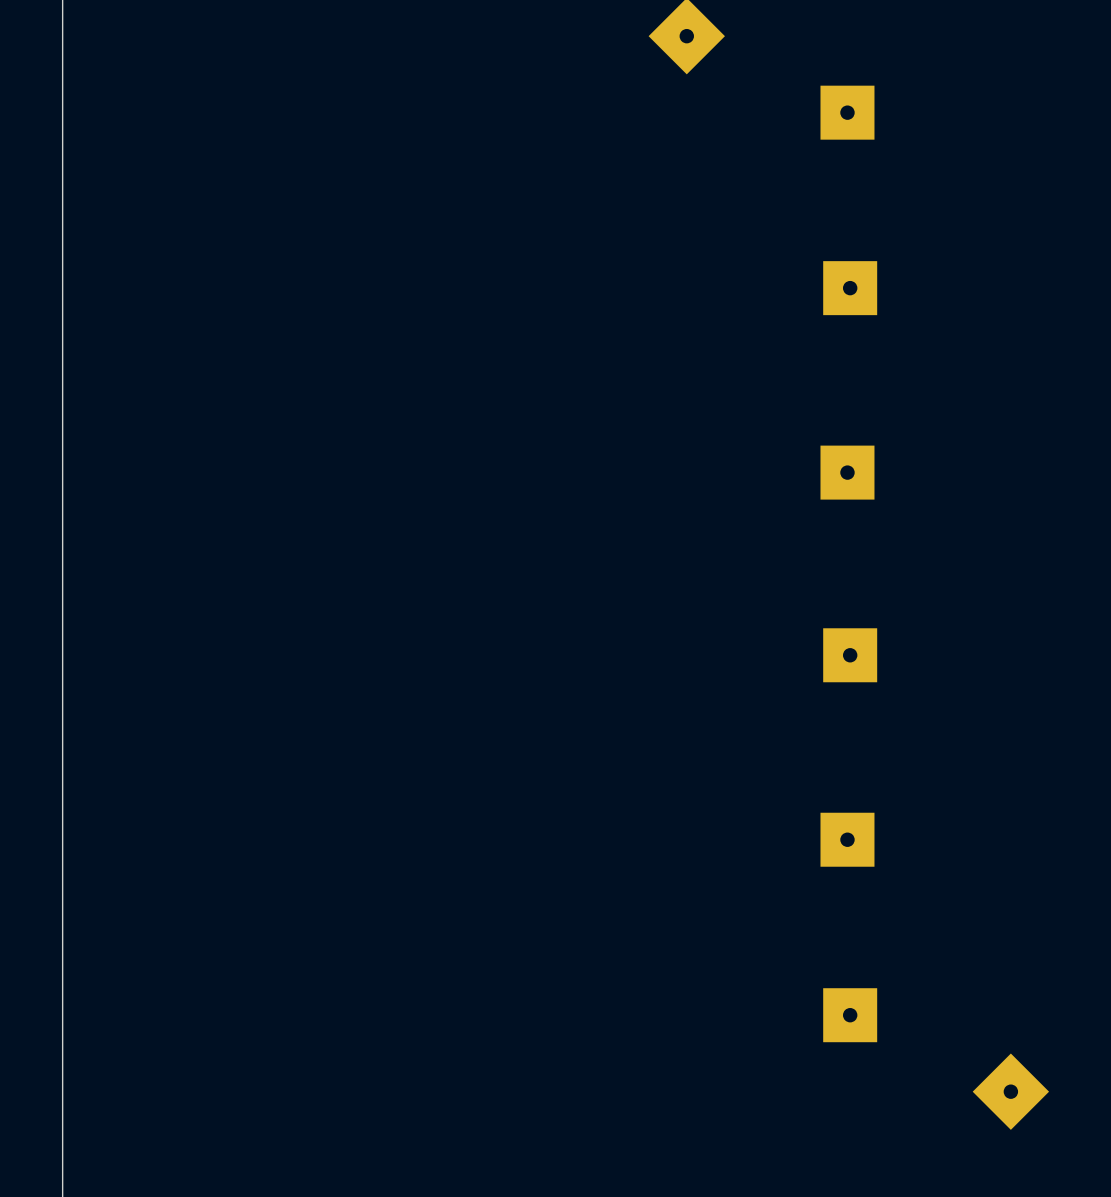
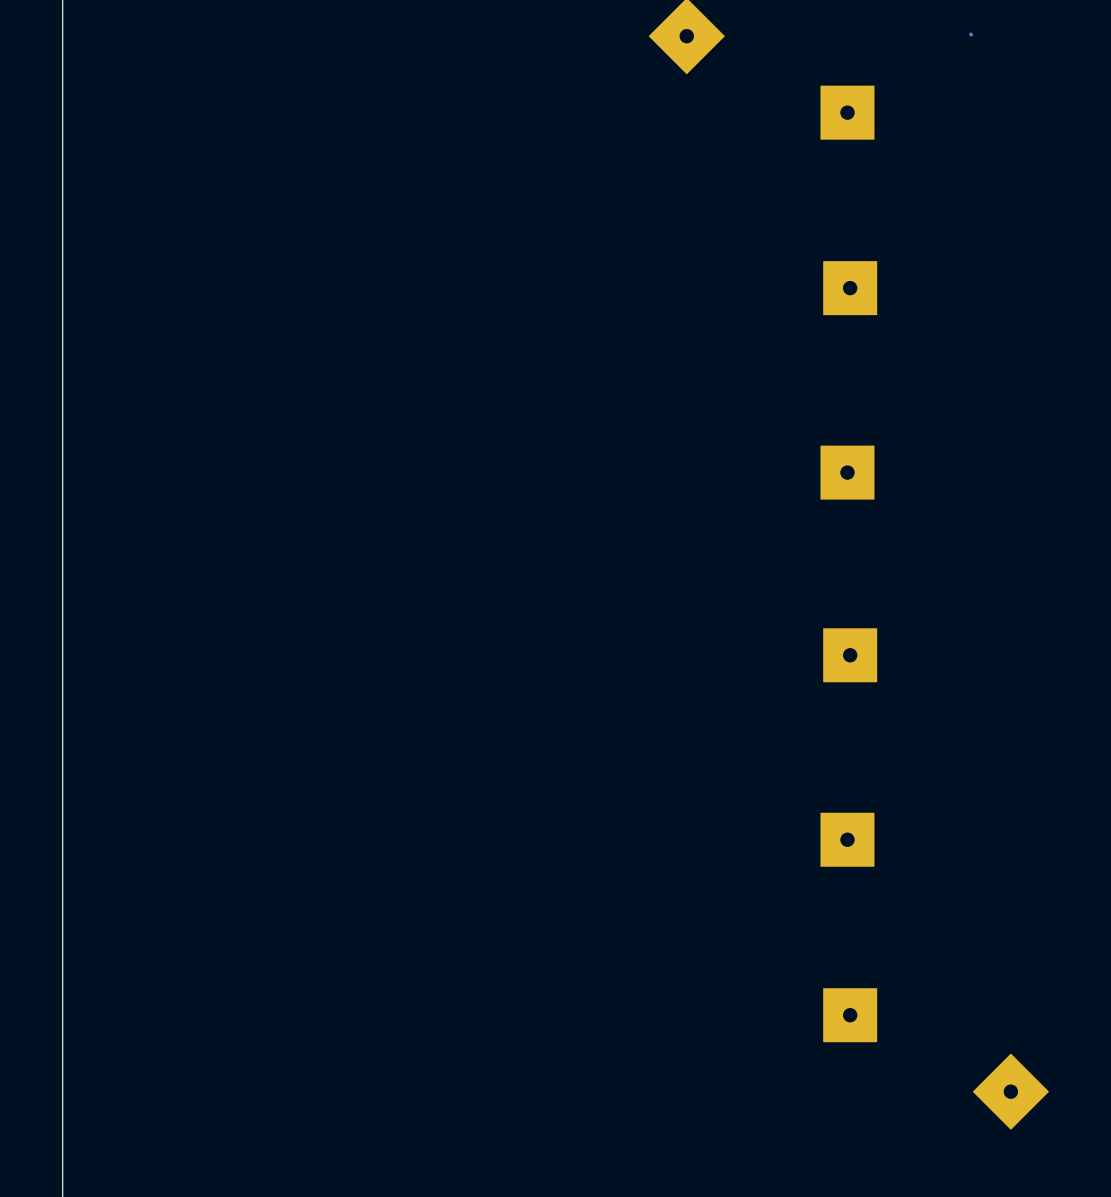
bottom track: none -> (970, 34) (971, 34)

